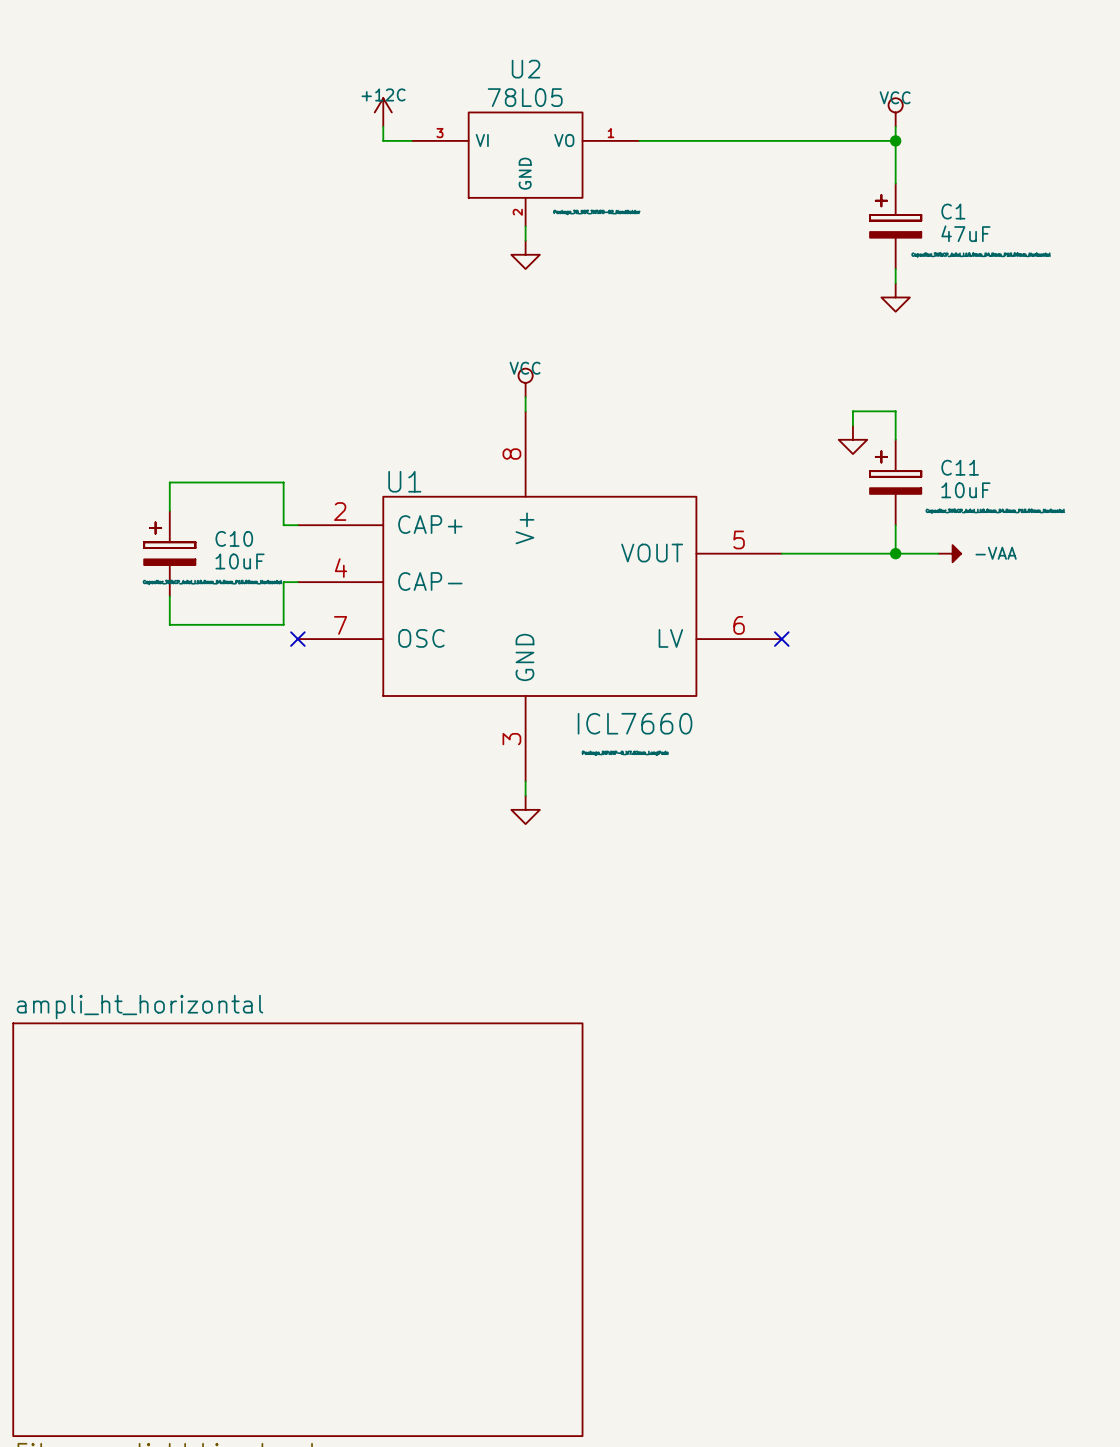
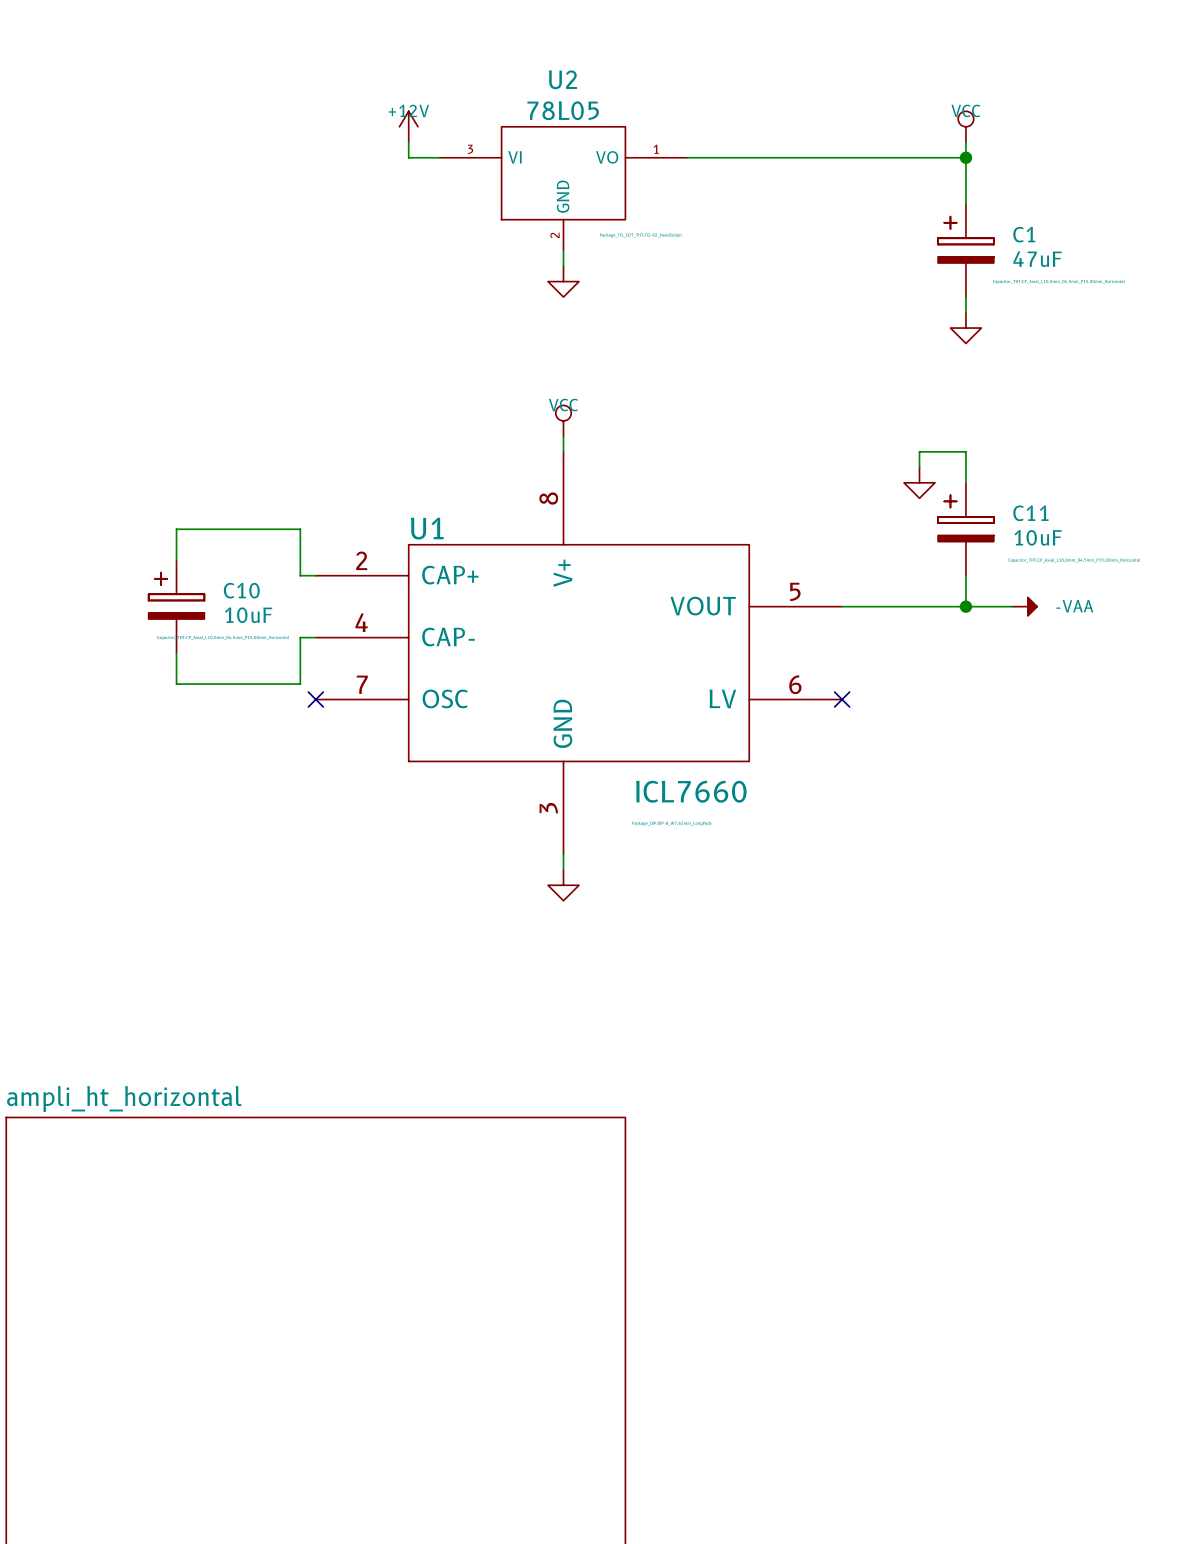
power symbol: +12C (383, 112) -> +12V (408, 126)

